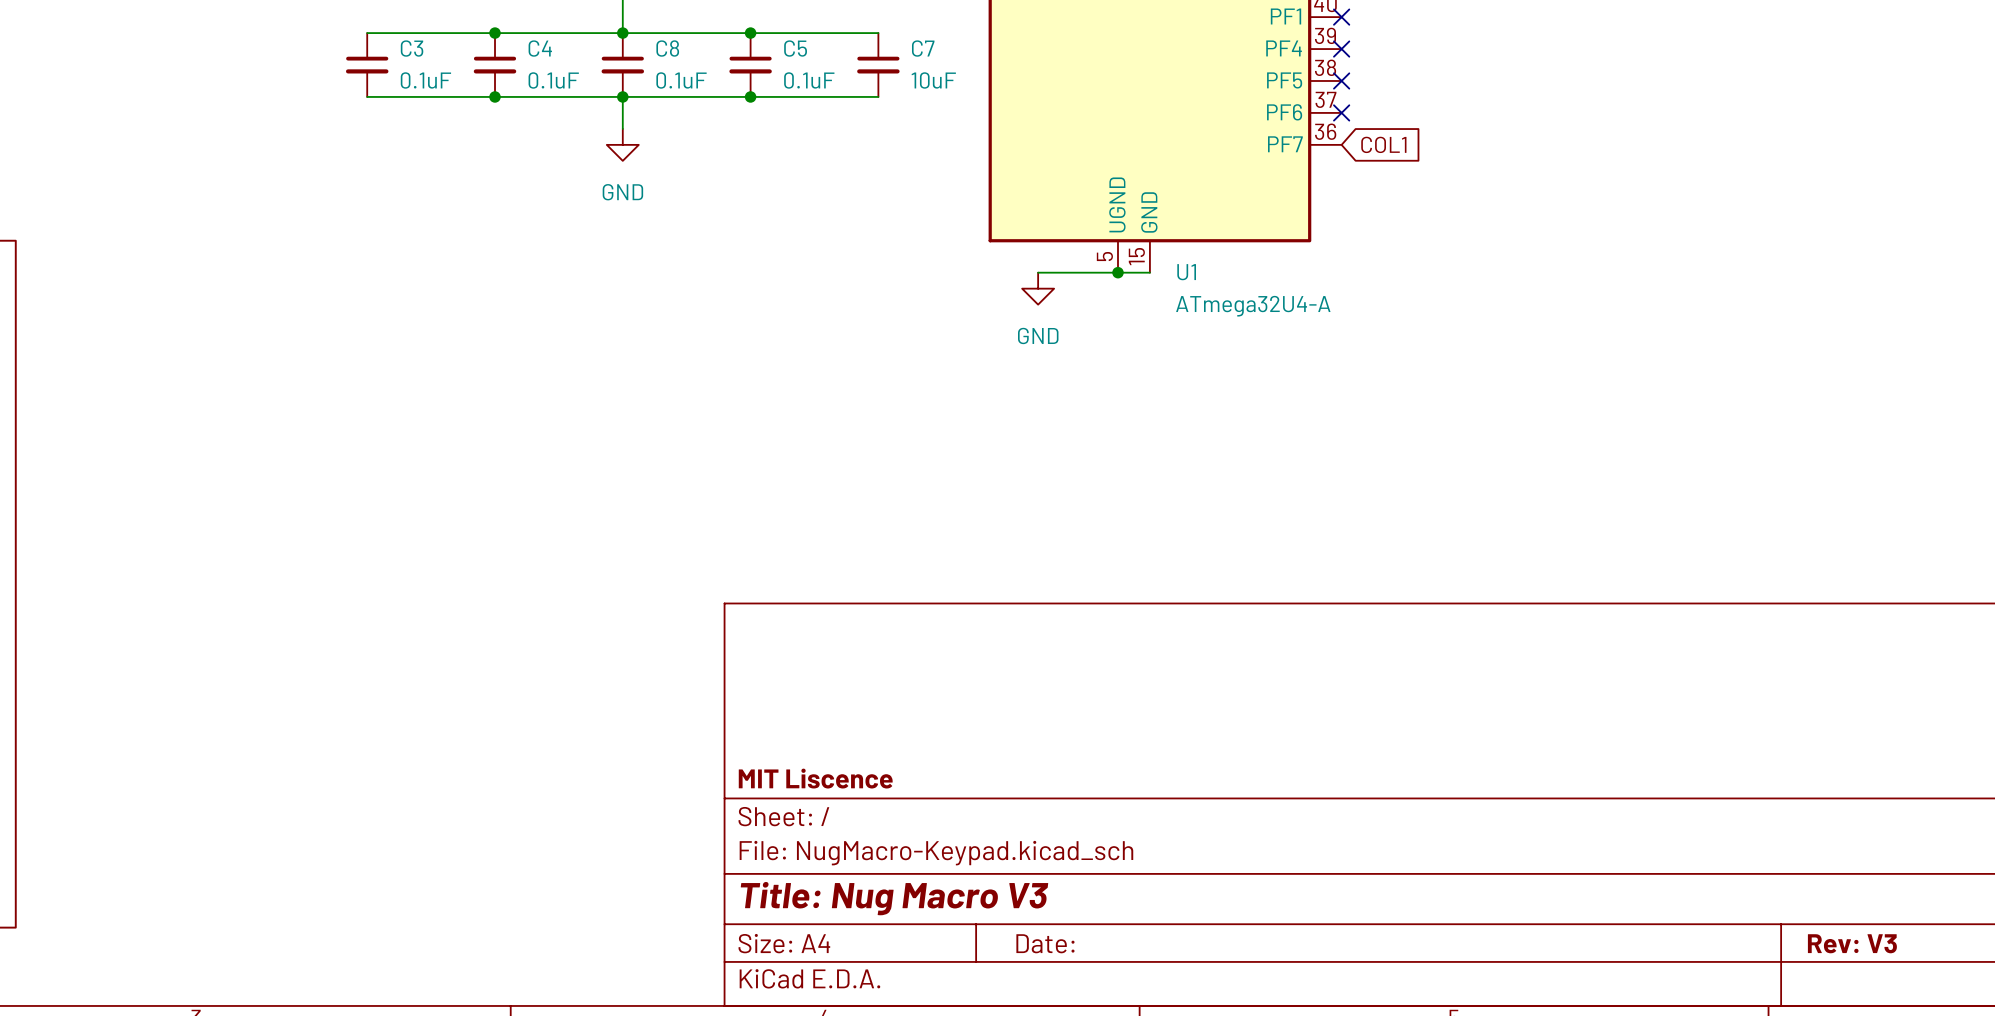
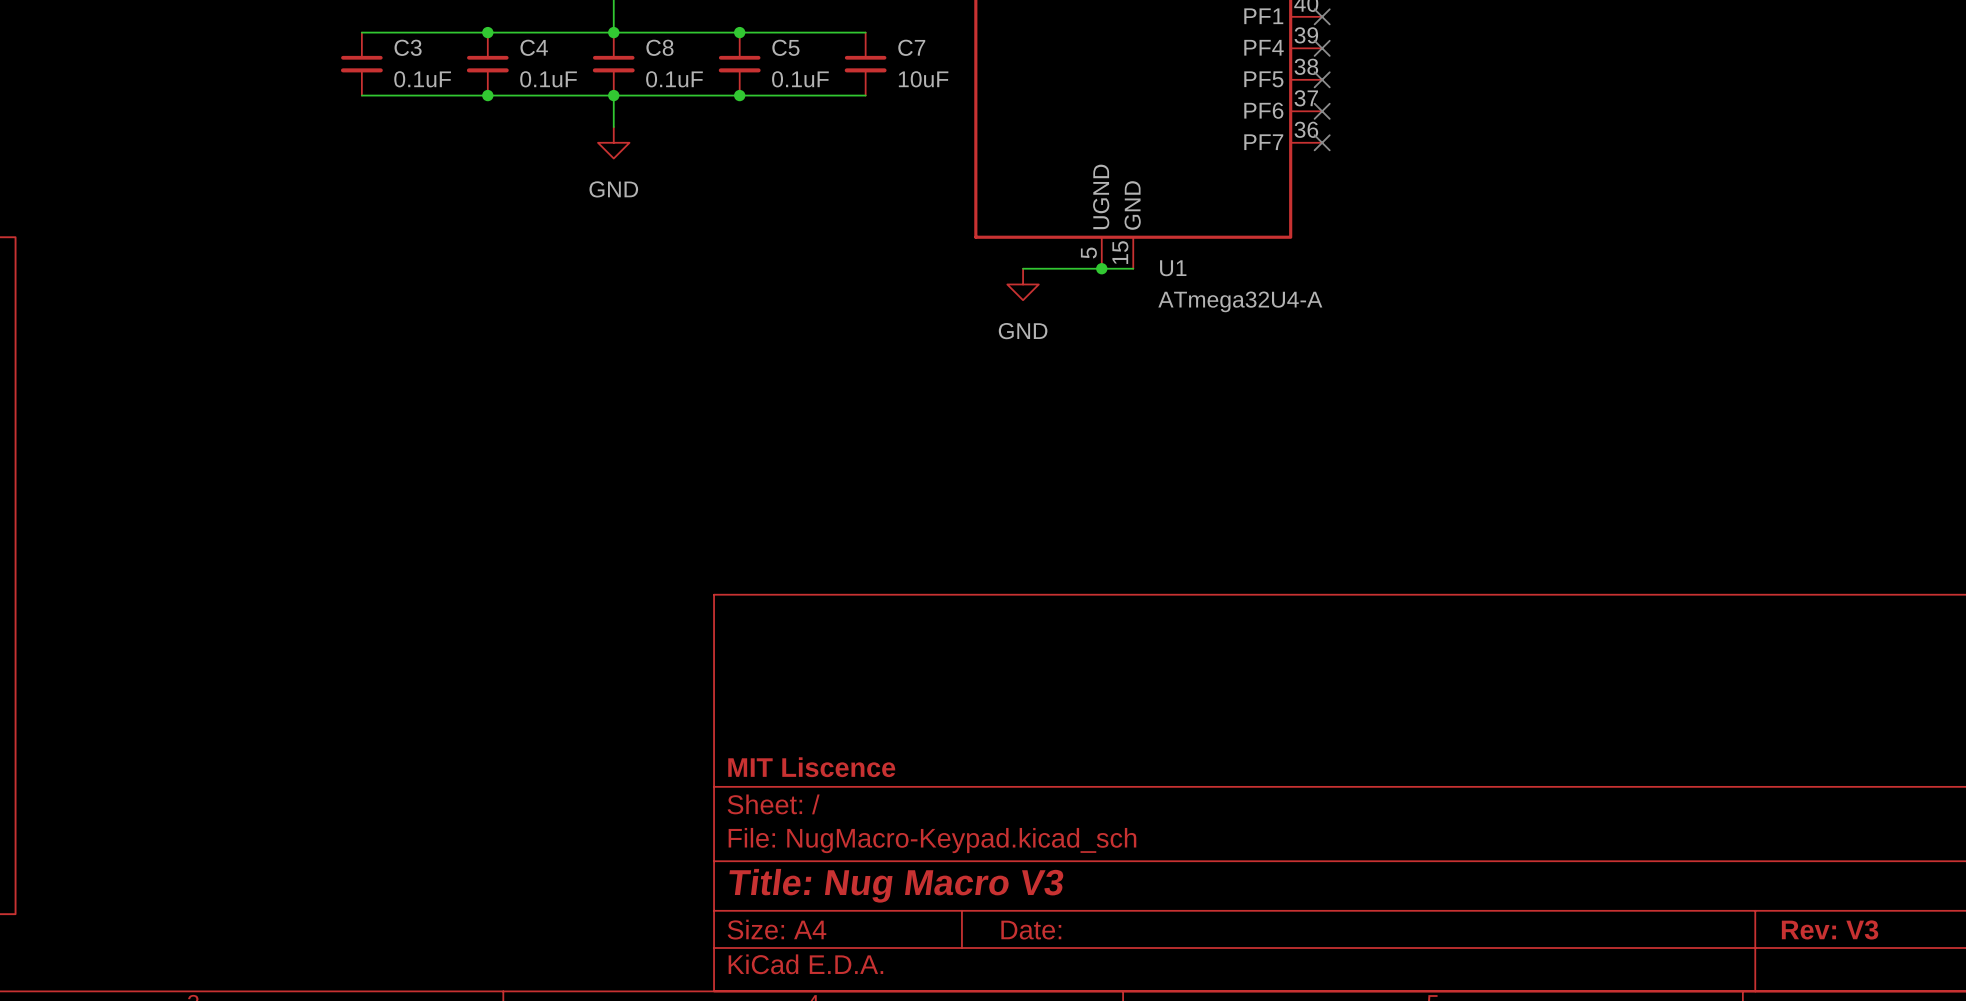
no-connect mark: none -> (1322, 142)
global label: COL1 (1383, 144) -> none

